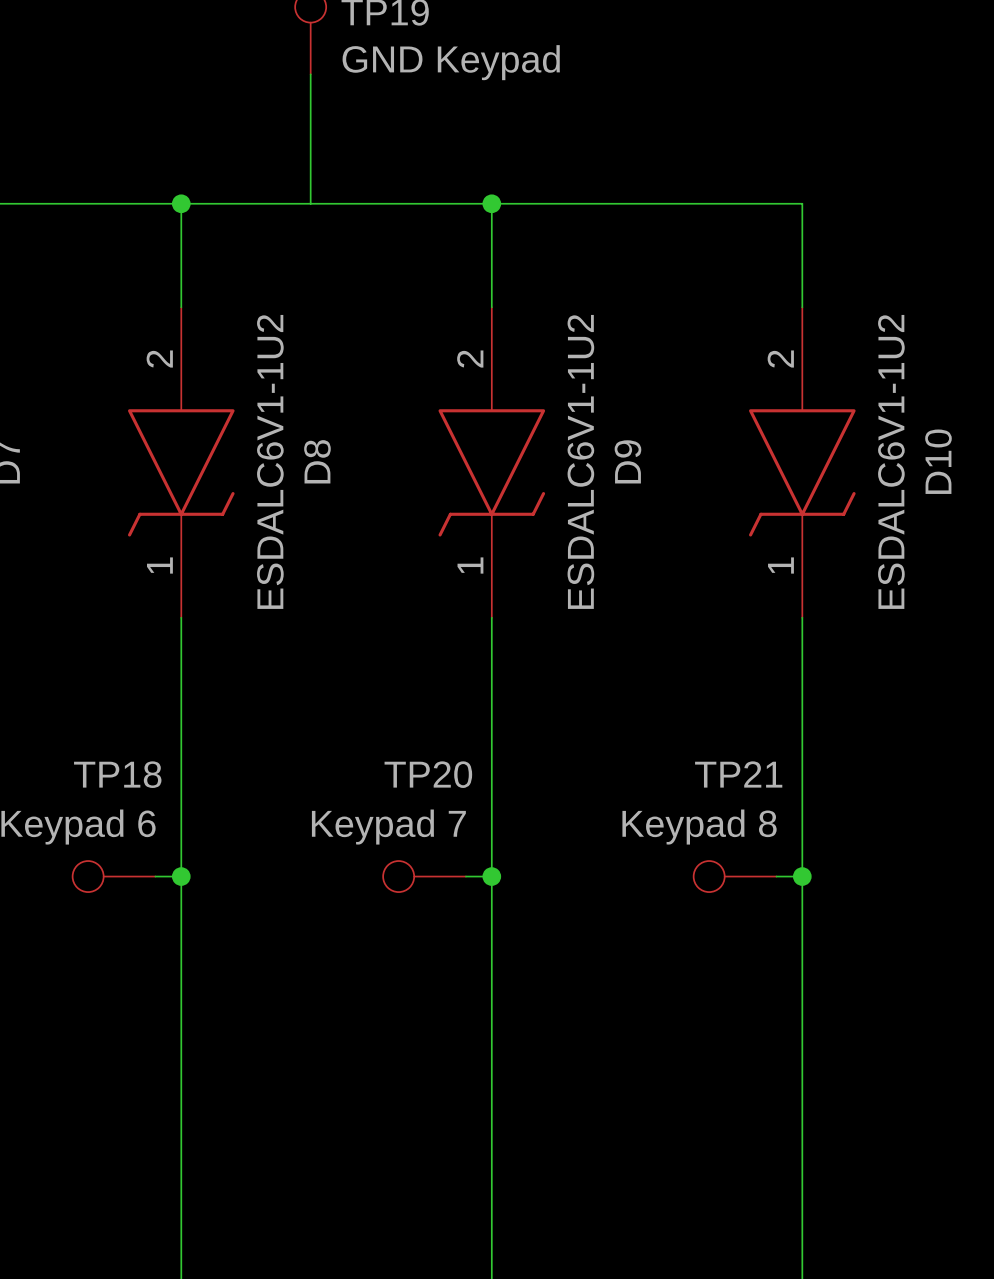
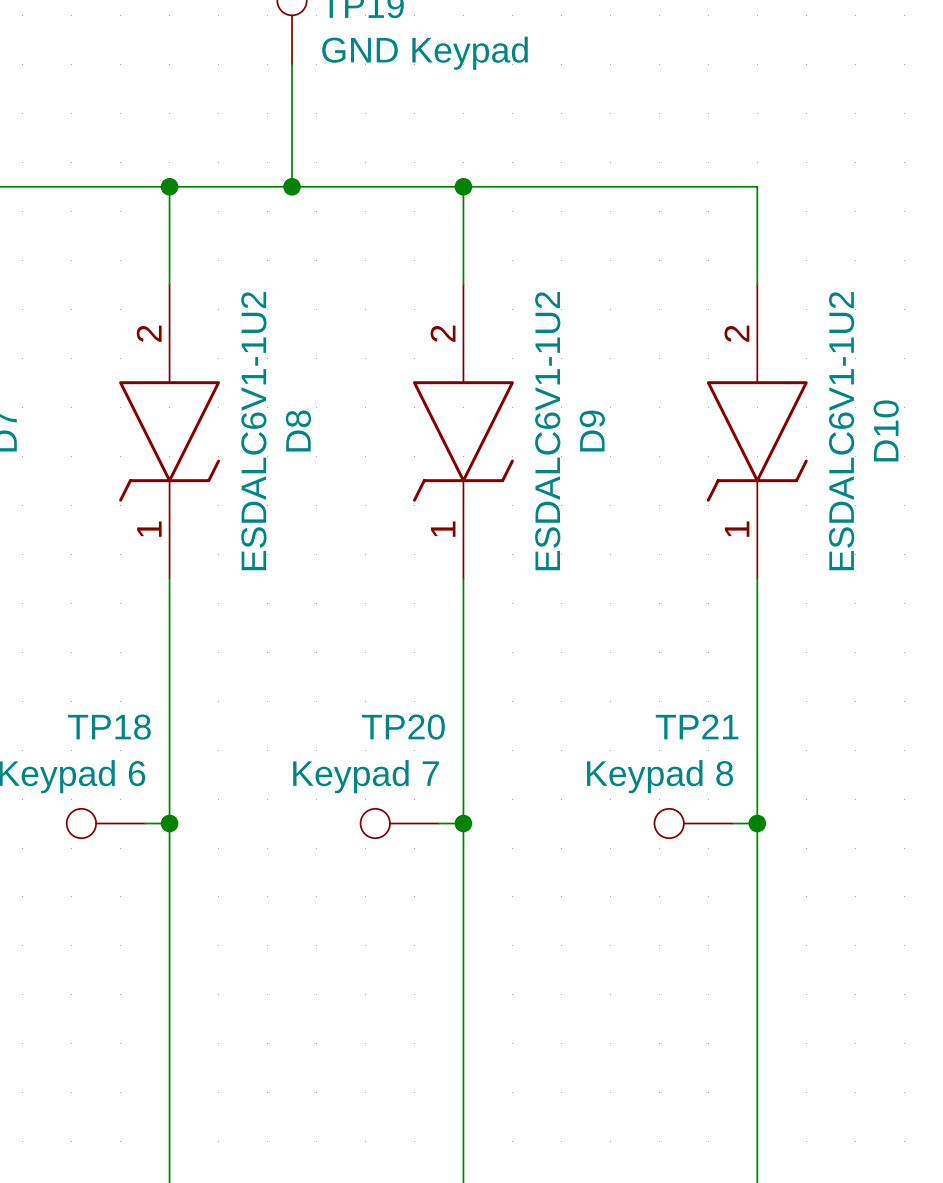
junction: none -> (292, 186)

